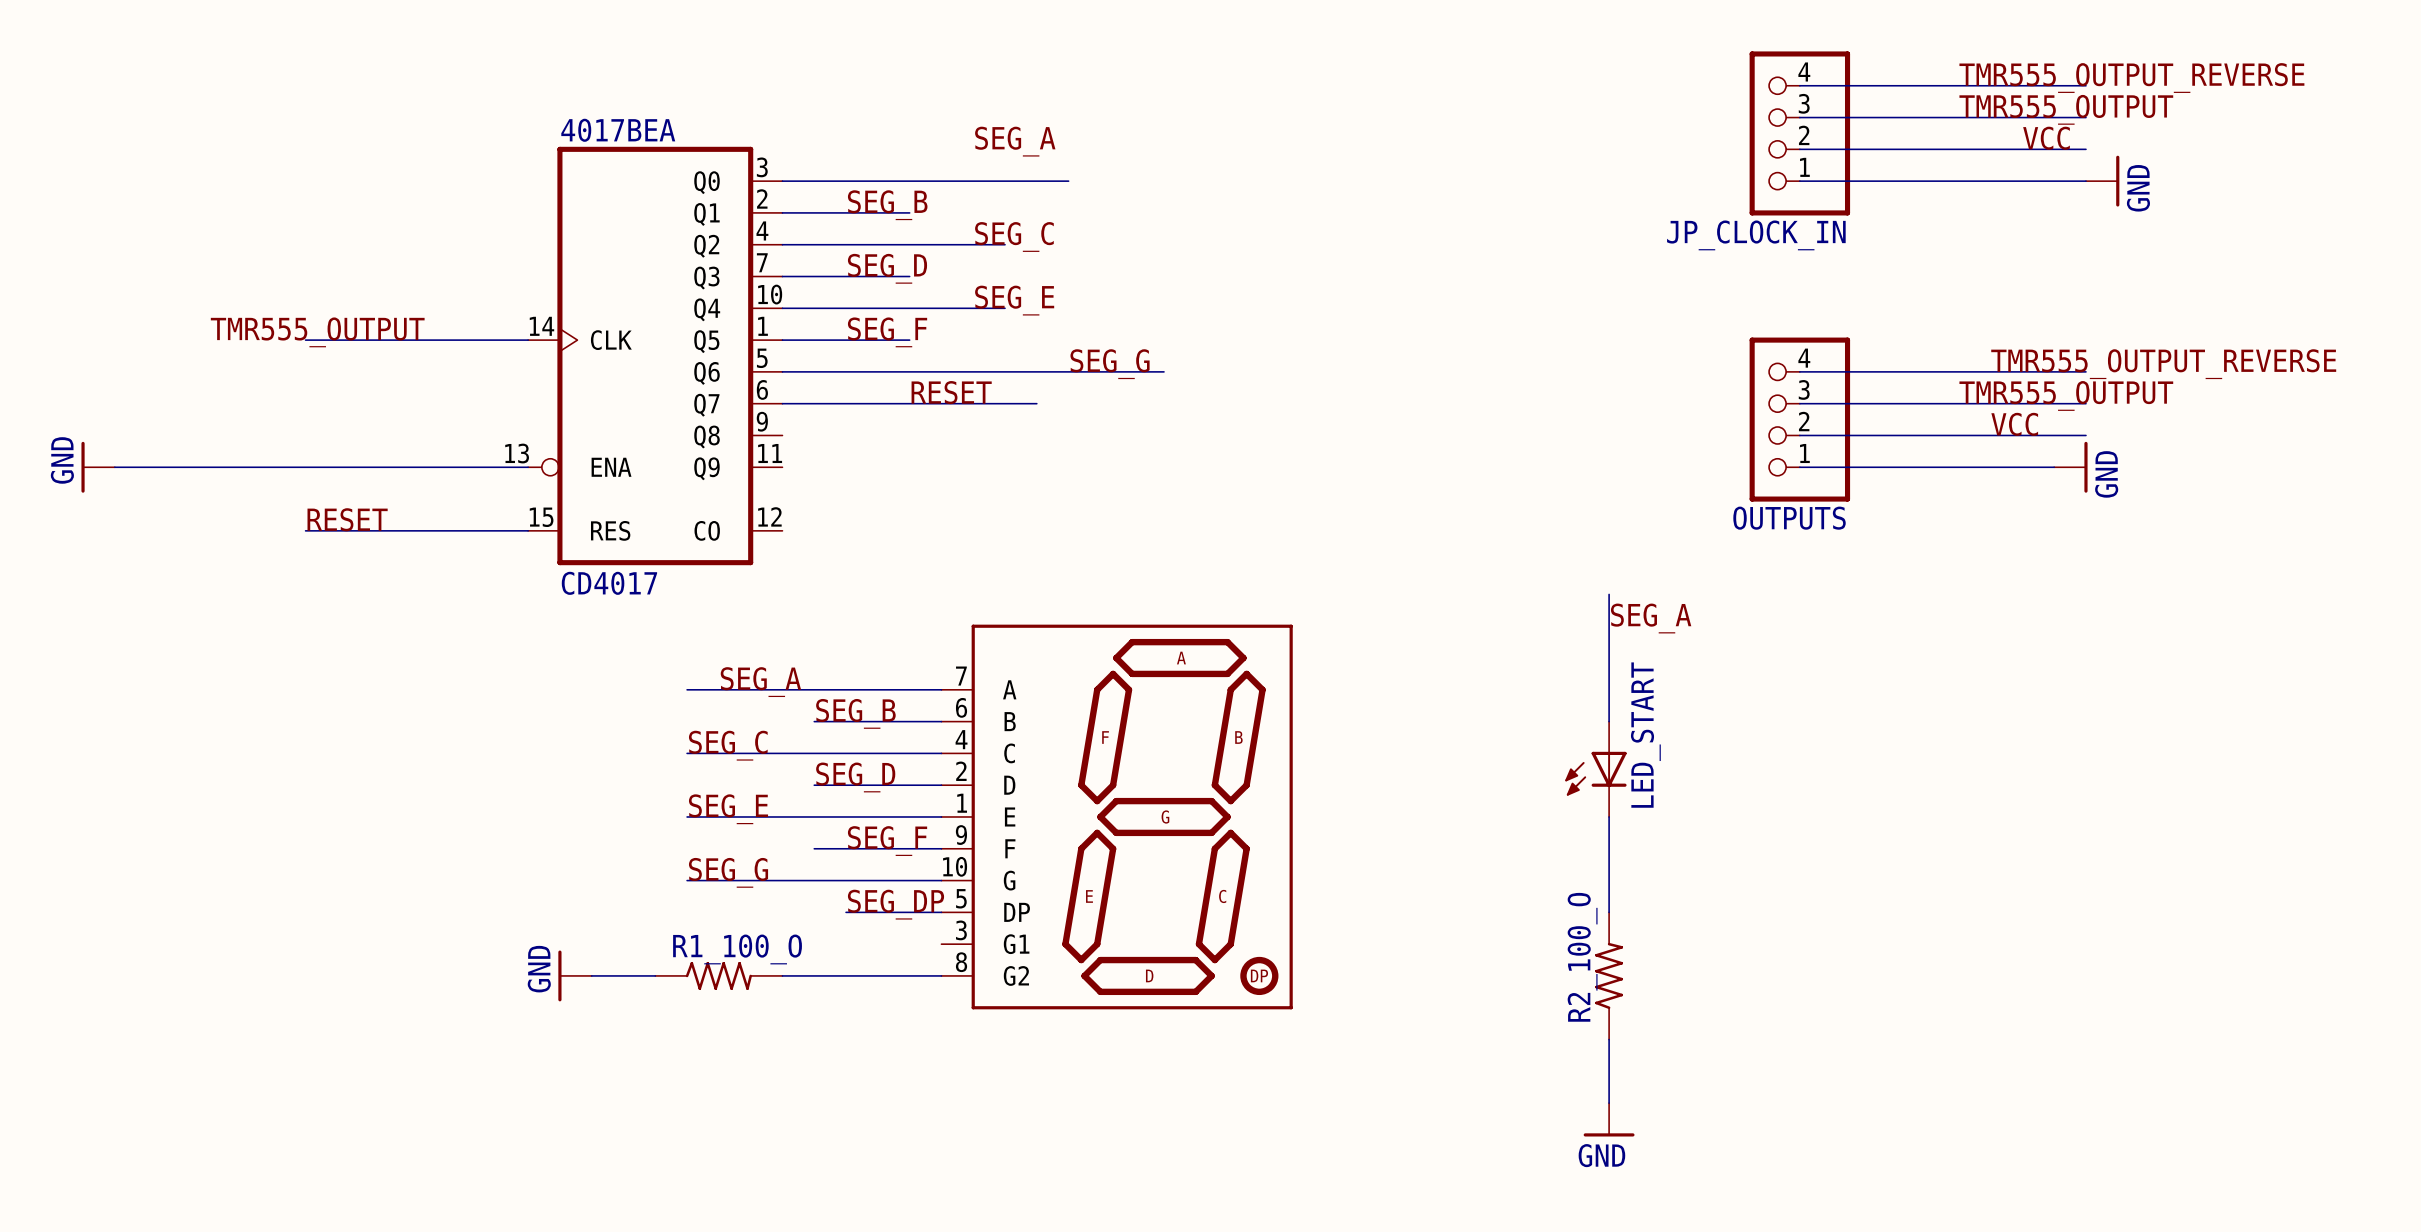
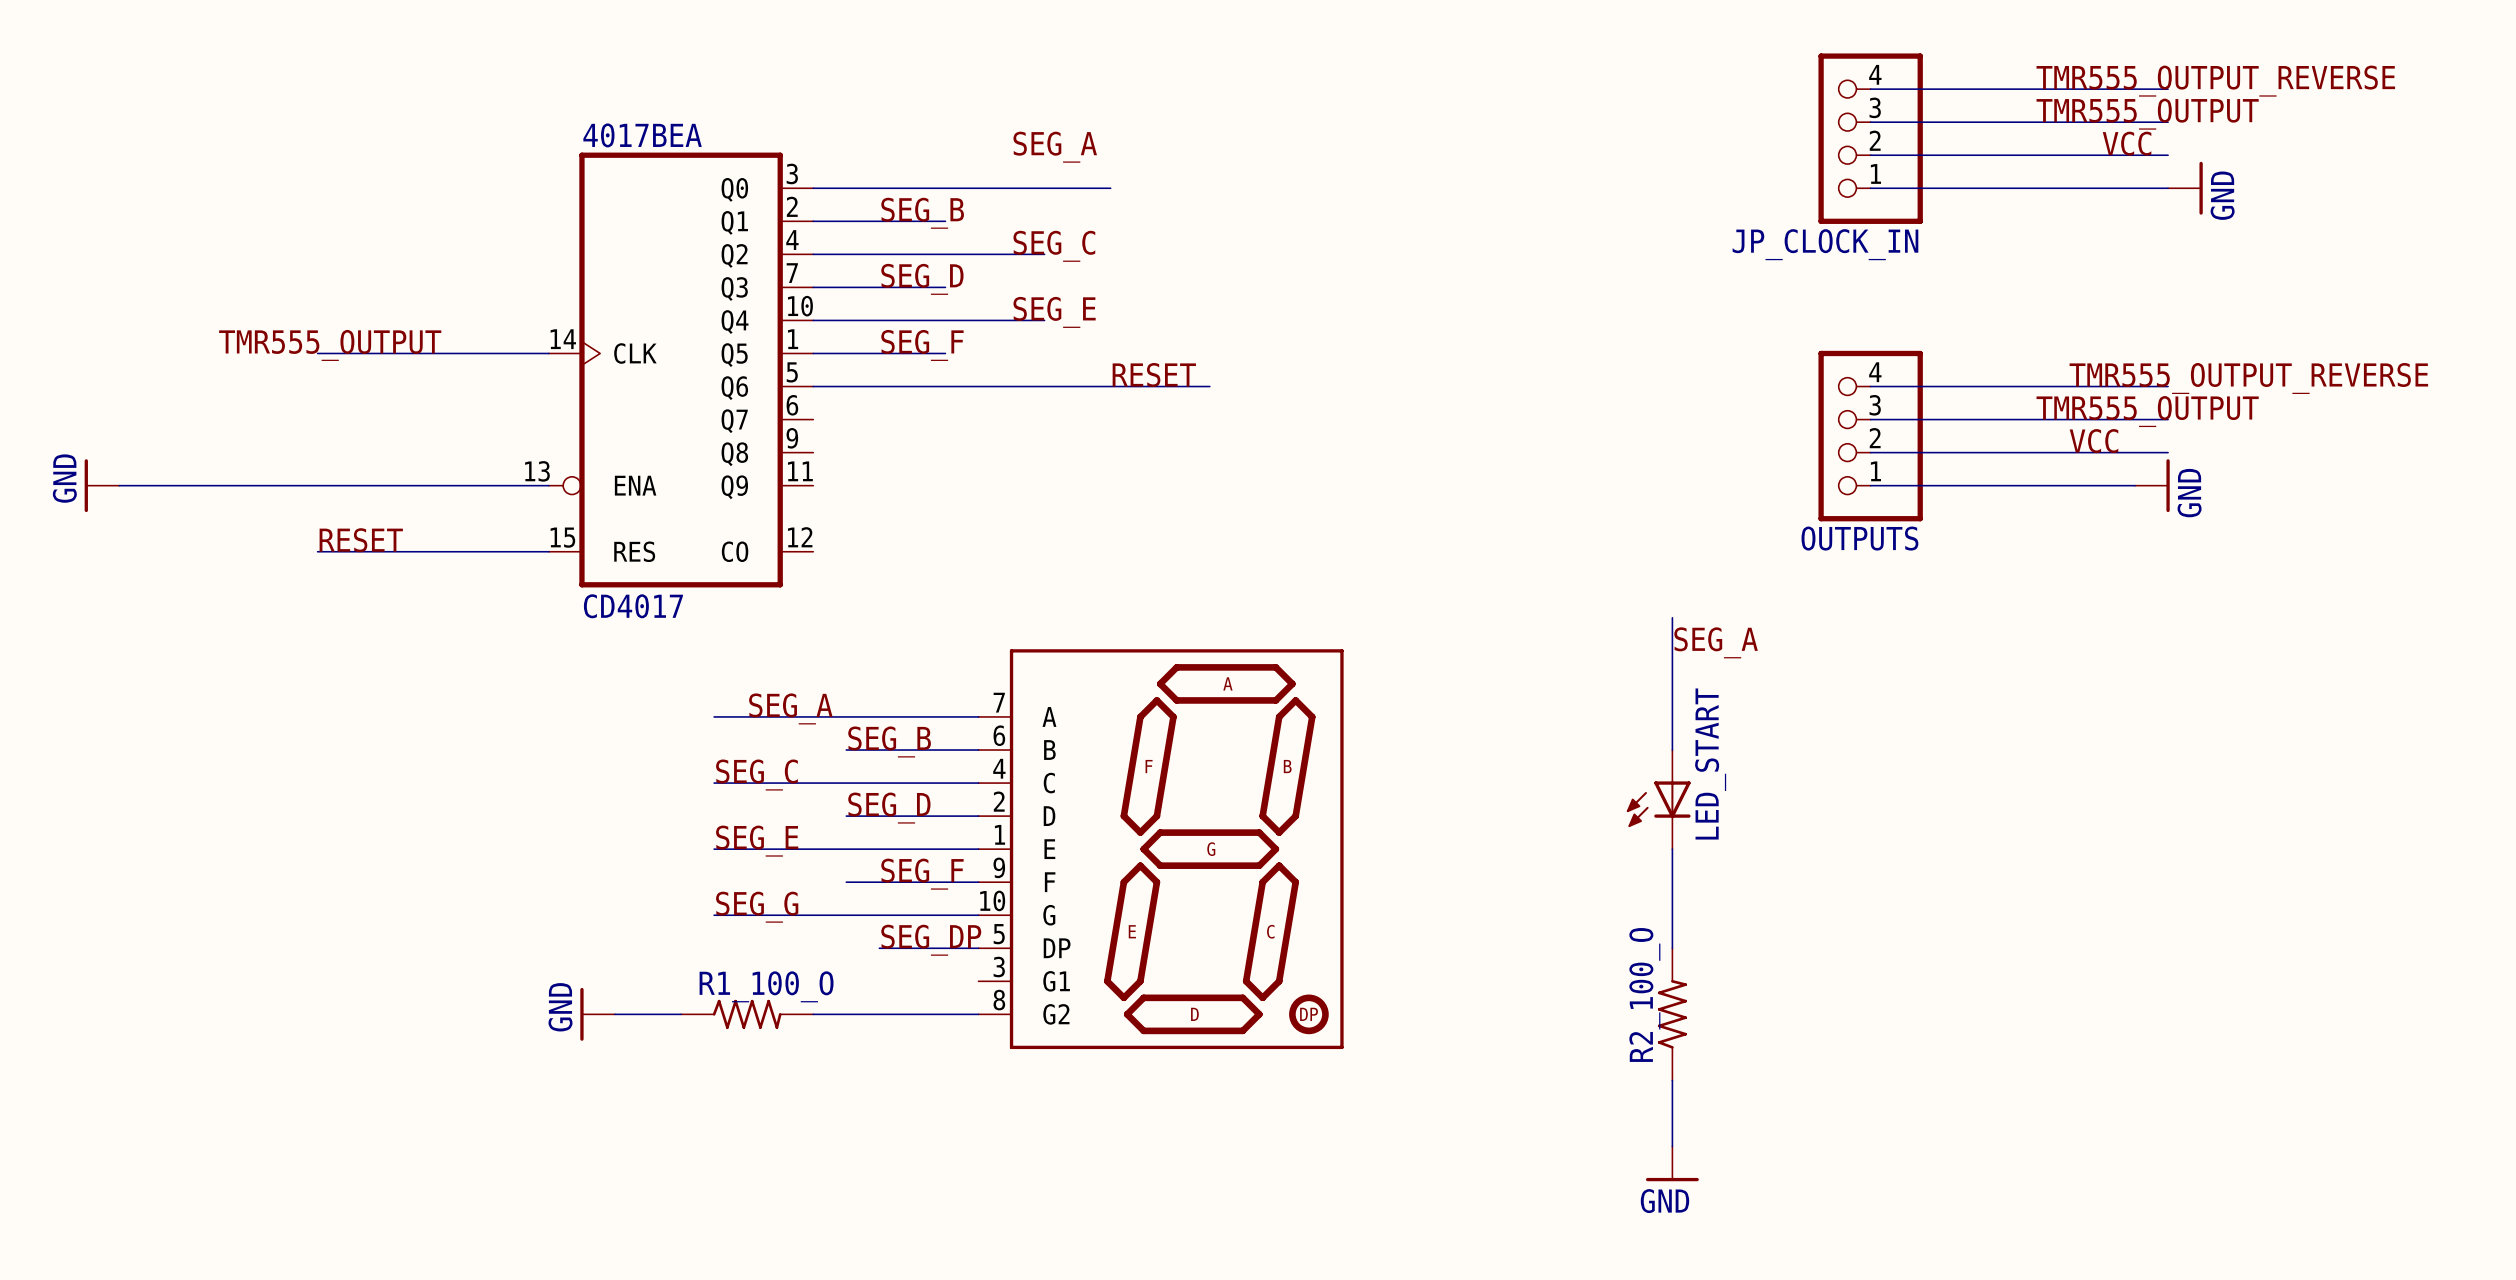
label: SEG_G (1110, 364) -> RESET (1154, 374)
label: RESET (951, 392) -> none
wire: (782, 403) (1036, 403) -> none

